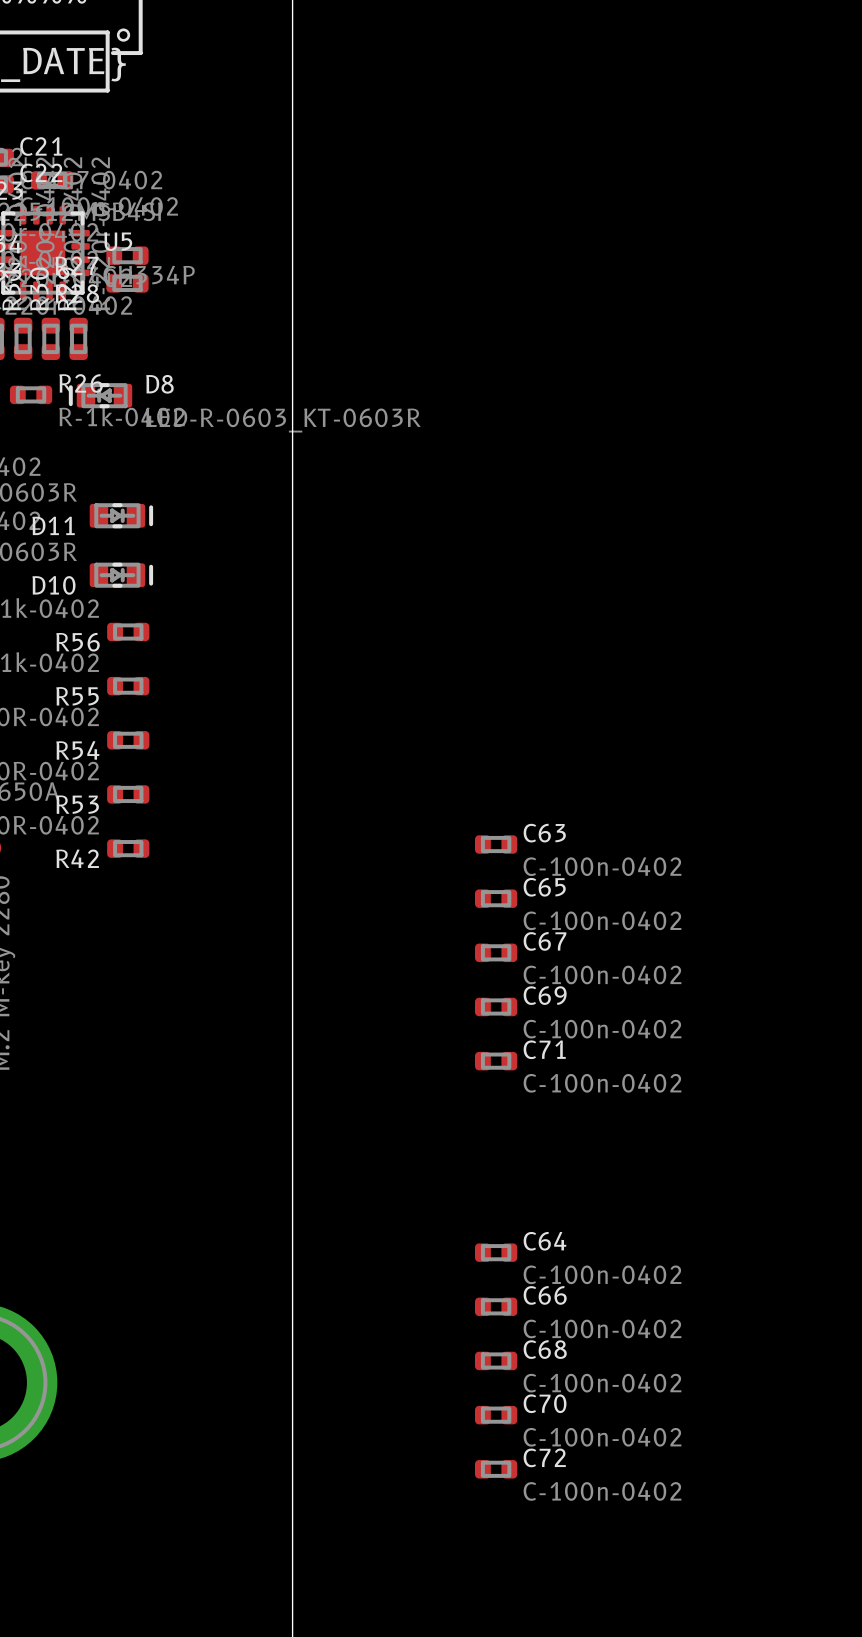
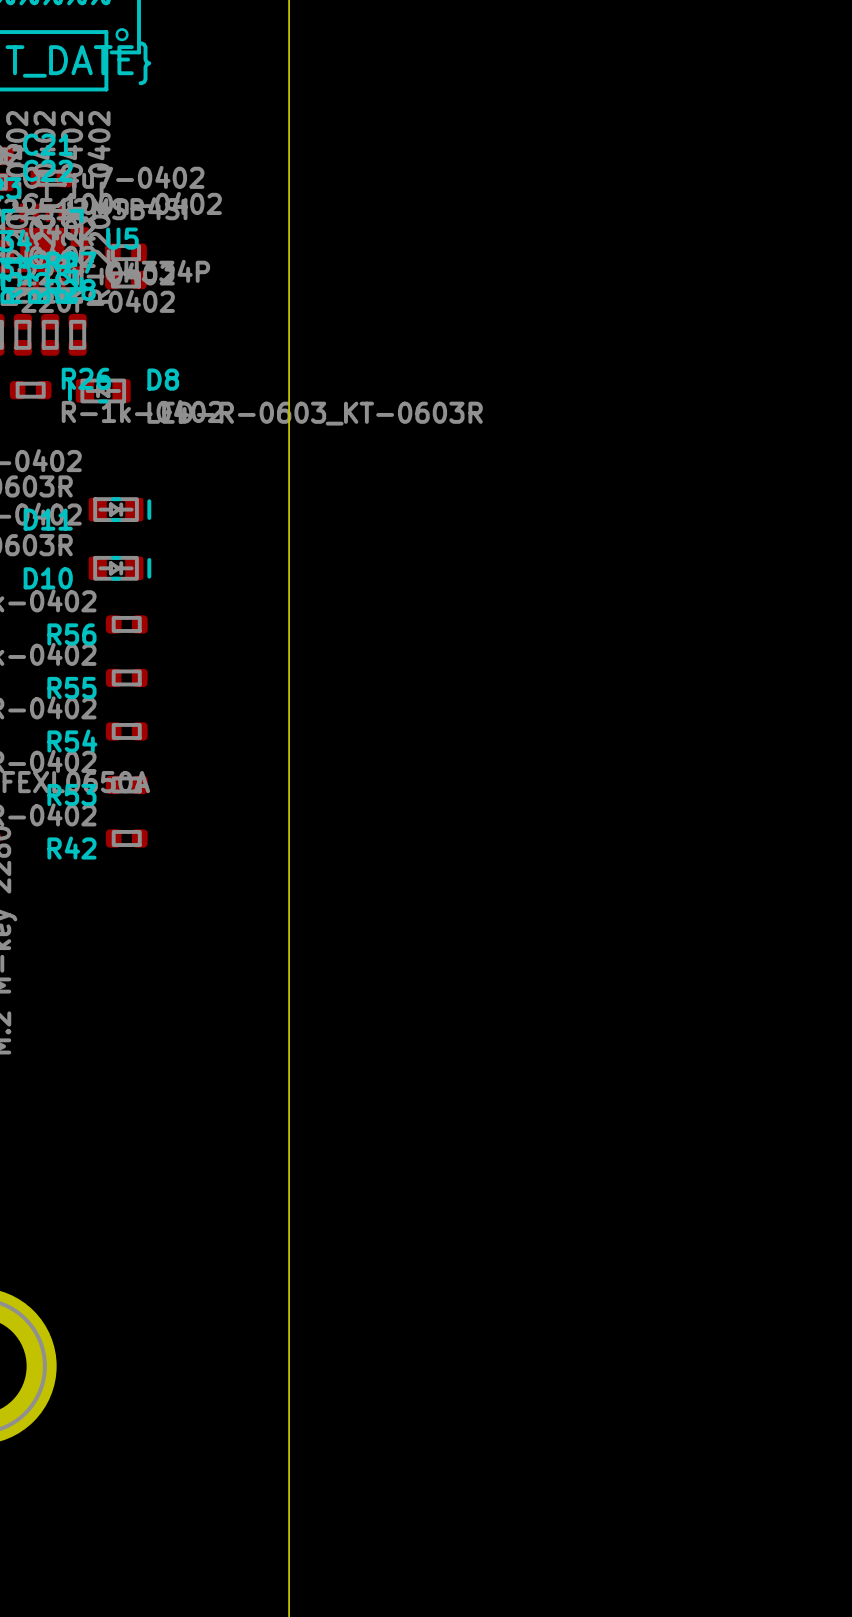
C63: C-100n-0402 (496, 844) -> none
C65: C-100n-0402 (496, 898) -> none
C67: C-100n-0402 (496, 952) -> none
C69: C-100n-0402 (496, 1006) -> none
C71: C-100n-0402 (496, 1061) -> none
C64: C-100n-0402 (496, 1252) -> none
C66: C-100n-0402 (496, 1306) -> none
C68: C-100n-0402 (496, 1360) -> none
C70: C-100n-0402 (496, 1415) -> none
C72: C-100n-0402 (496, 1469) -> none

